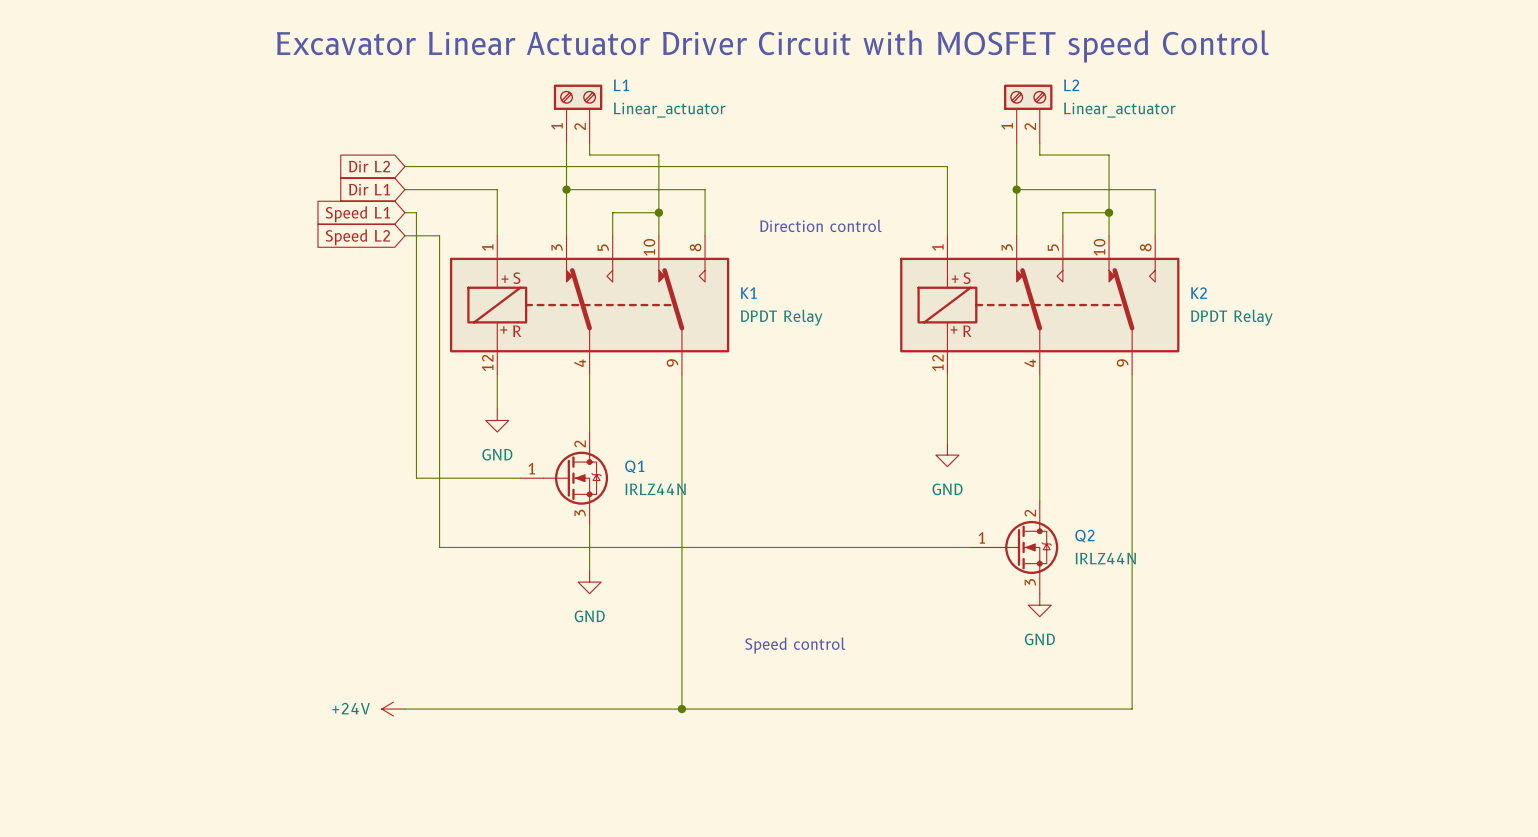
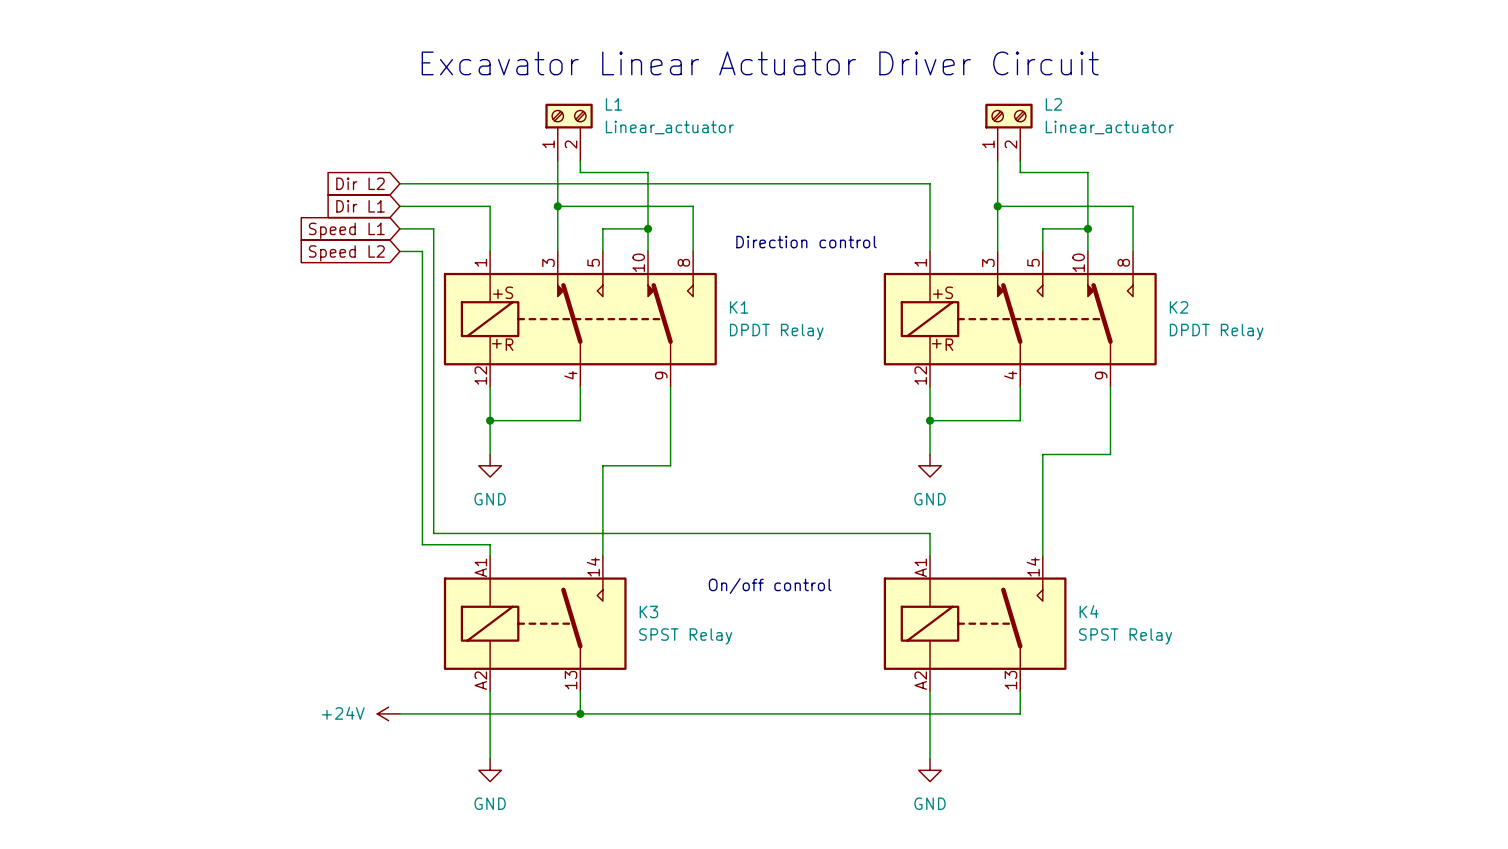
text: Excavator Linear Actuator Driver Circuit with MOSFET speed Control (772, 46) -> Excavator Linear Actuator Driver Circuit (760, 63)
wire: (416, 212) (416, 478) (520, 478) -> none
wire: (428, 235) (439, 235) -> (411, 228) (433, 228) (433, 251)
wire: none -> (422, 251) (422, 544) (490, 544) (490, 556)
junction: none -> (490, 420)
wire: (589, 408) (589, 432) -> (580, 420) (490, 420) (490, 454)
junction: none -> (930, 420)
wire: (1039, 408) (1039, 501) -> (1020, 420) (930, 420)
power symbol position: GND (497, 420) -> GND (490, 465)
wire: (1132, 443) (1132, 709) (1039, 709) -> (1110, 454) (1042, 454) (1042, 556)
wire: (681, 455) (681, 709) -> (670, 465) (602, 465) (602, 556)
Q1: IRLZ44N (564, 478) -> none
wire: (439, 524) (439, 547) (970, 547) -> (433, 533) (930, 533) (930, 556)
wire: (589, 524) (589, 570) -> none
Q2: IRLZ44N (1014, 547) -> none
text: none -> On/off control (770, 586)
power symbol: GND (589, 582) -> none
power symbol position: GND (1039, 605) -> GND (930, 770)
K3: none -> SPST Relay (535, 623)
K4: none -> SPST Relay (975, 623)
text: Speed control (795, 645) -> none
wire: none -> (490, 691) (490, 759)
wire: none -> (580, 691) (580, 713)
wire: none -> (930, 691) (930, 759)
wire: none -> (1020, 691) (1020, 713)
junction: none -> (580, 713)
junction: (681, 709) -> none
power symbol: none -> GND (490, 770)

